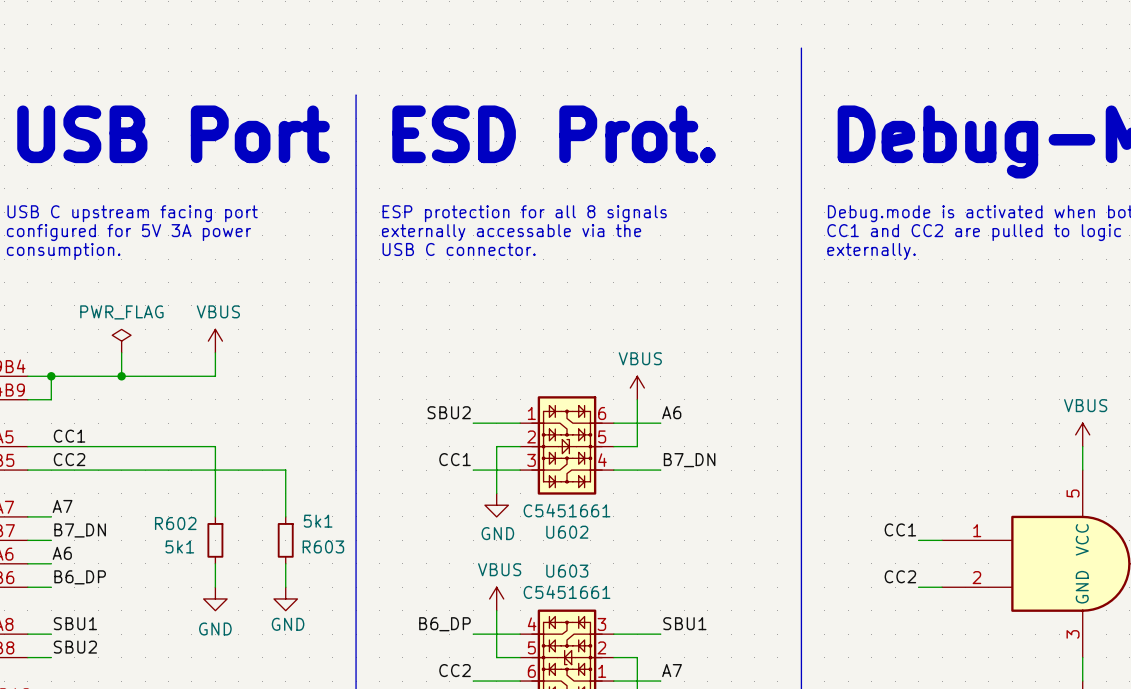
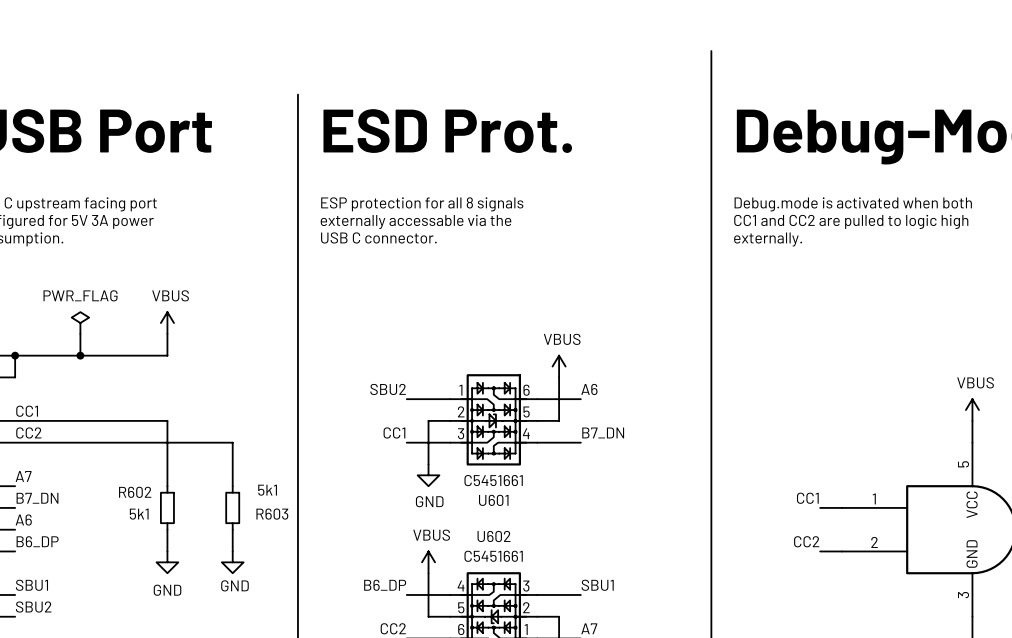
U602 name: U602 (567, 532) -> U601 (493, 500)
U603 name: U603 (567, 571) -> U602 (494, 536)

